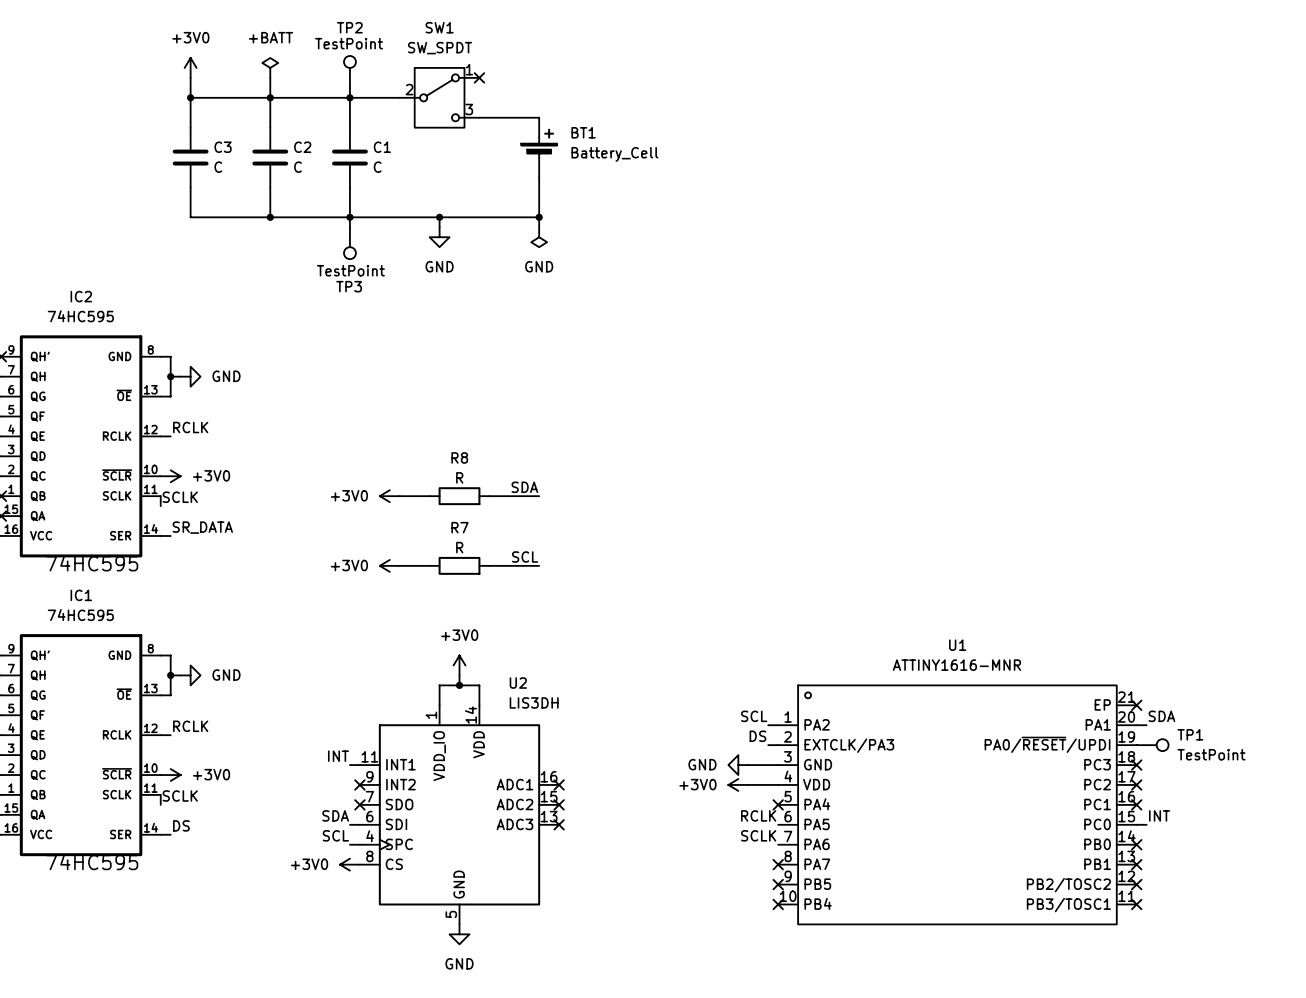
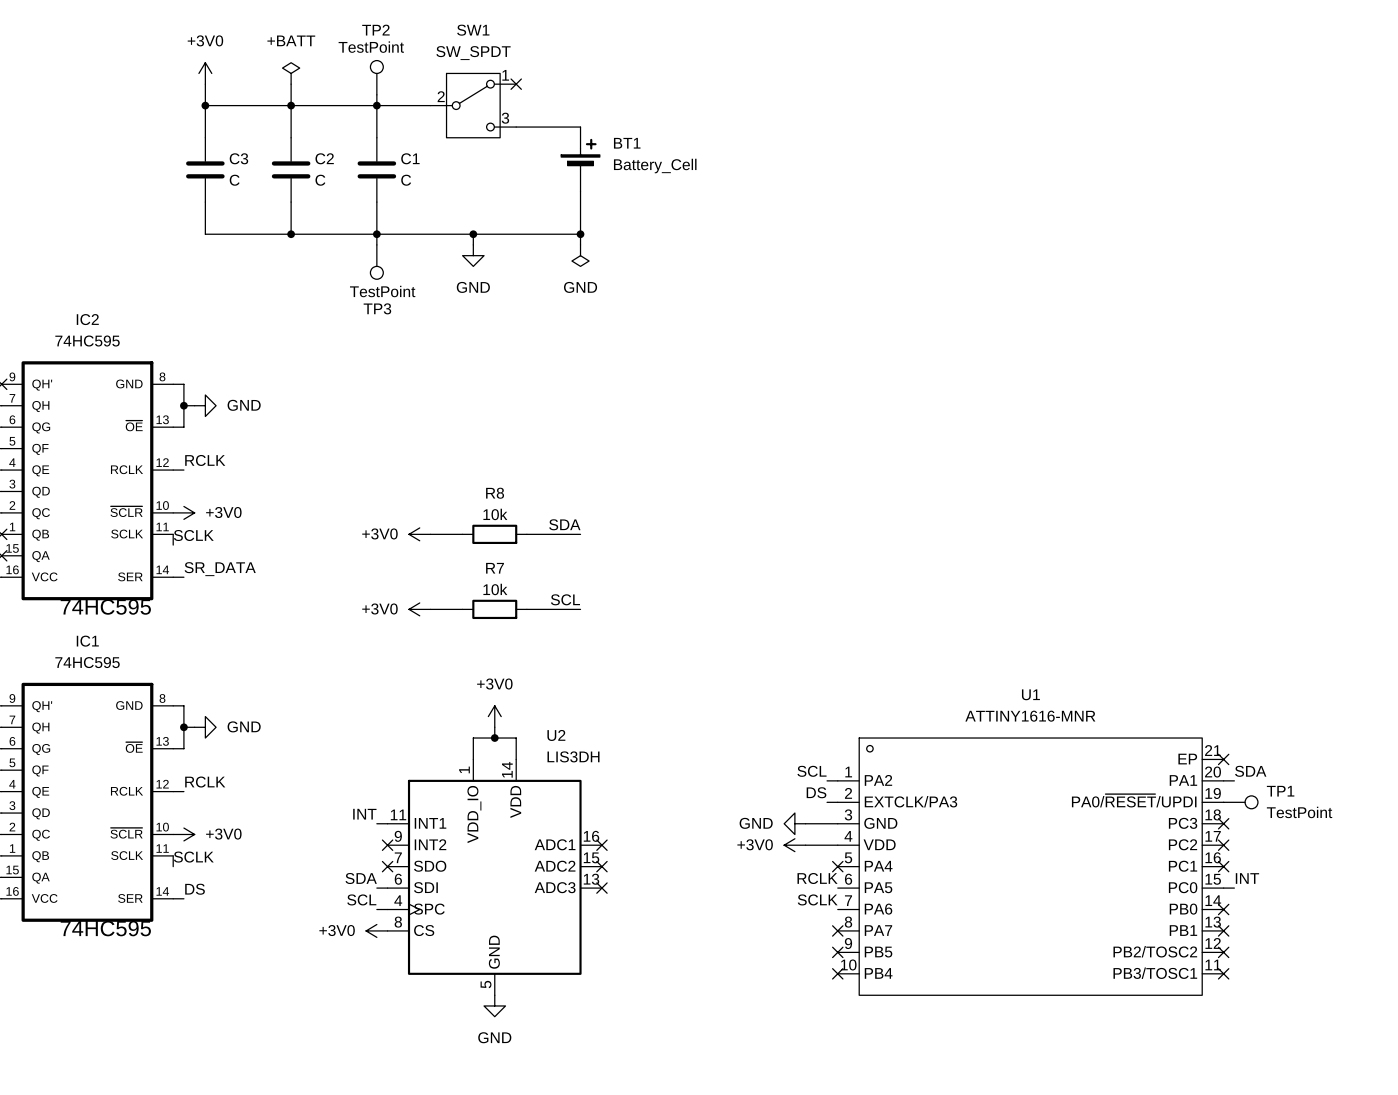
R8 value: R (459, 477) -> 10k (495, 514)
R7 value: R (459, 547) -> 10k (495, 589)

